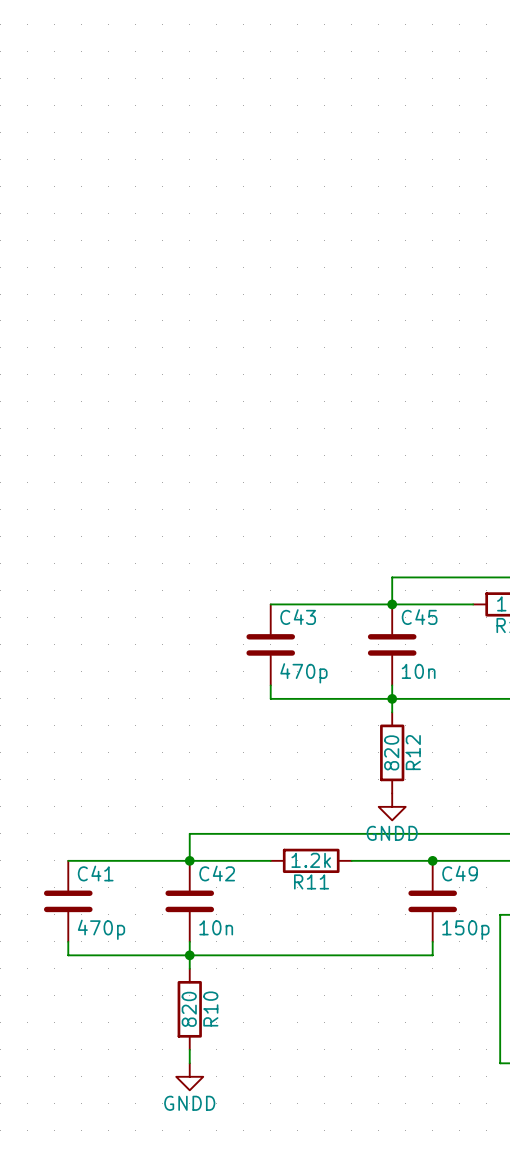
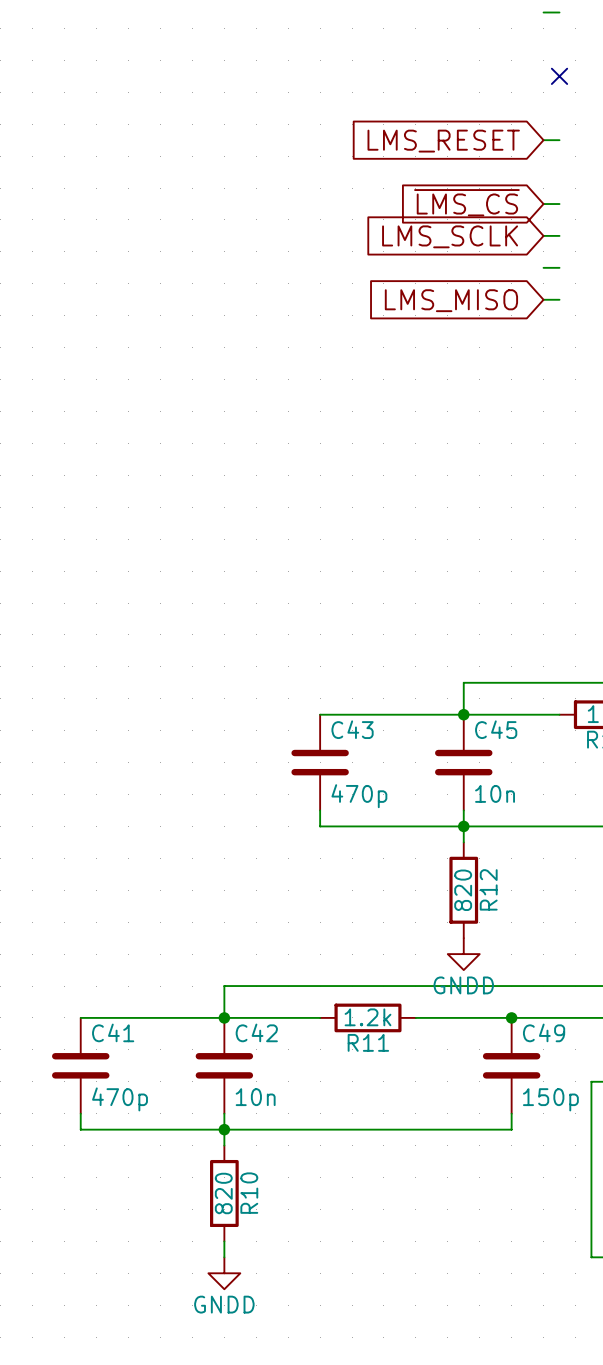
wire: none -> (543, 12) (559, 12)
no-connect mark: none -> (559, 76)
wire: none -> (543, 140) (559, 140)
global label: none -> LMS_RESET (443, 141)
global label: none -> ~{LMS_CS} (466, 202)
wire: none -> (543, 204) (559, 204)
wire: none -> (543, 235) (559, 235)
global label: none -> LMS_SCLK (450, 236)
wire: none -> (543, 267) (559, 267)
wire: none -> (543, 299) (559, 299)
global label: none -> LMS_MISO (451, 300)

